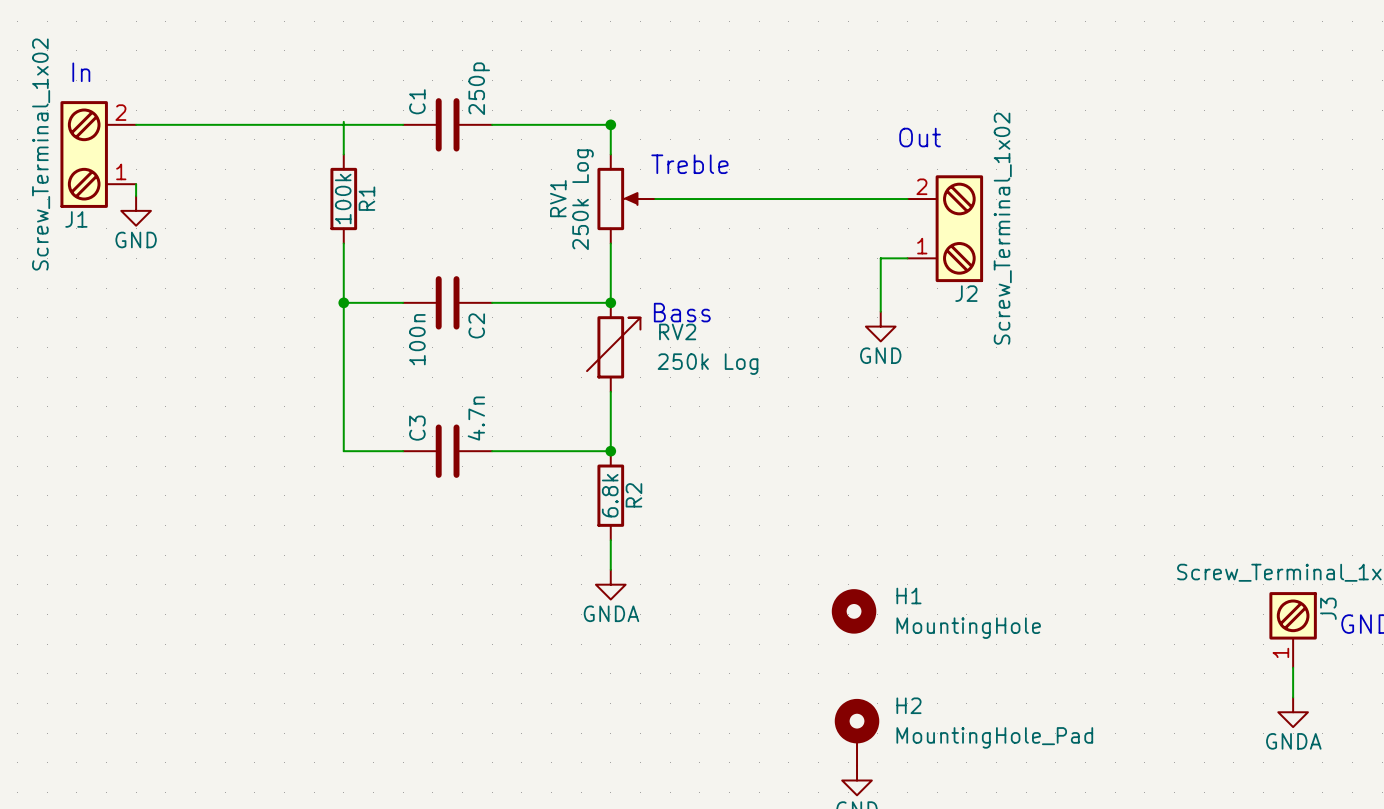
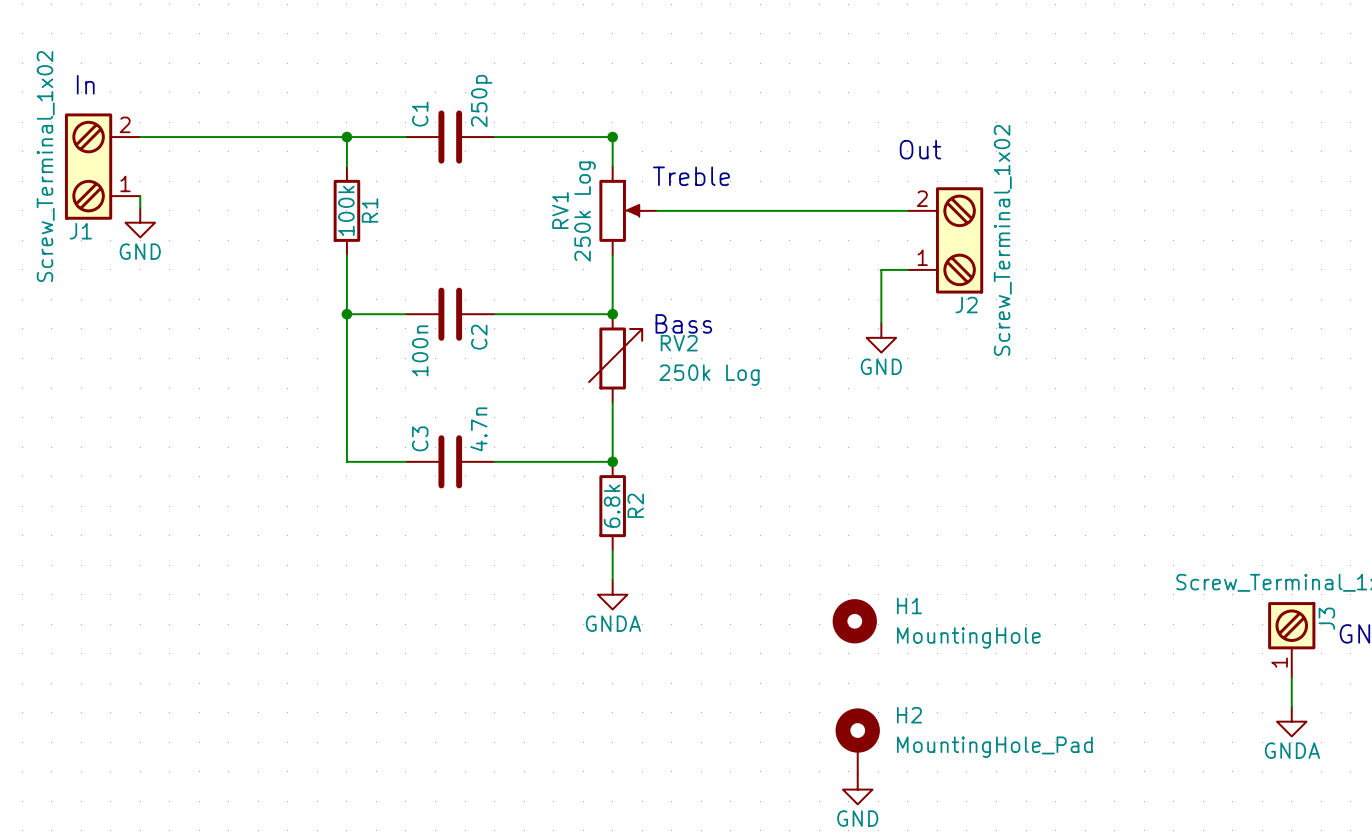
junction: none -> (346, 137)

